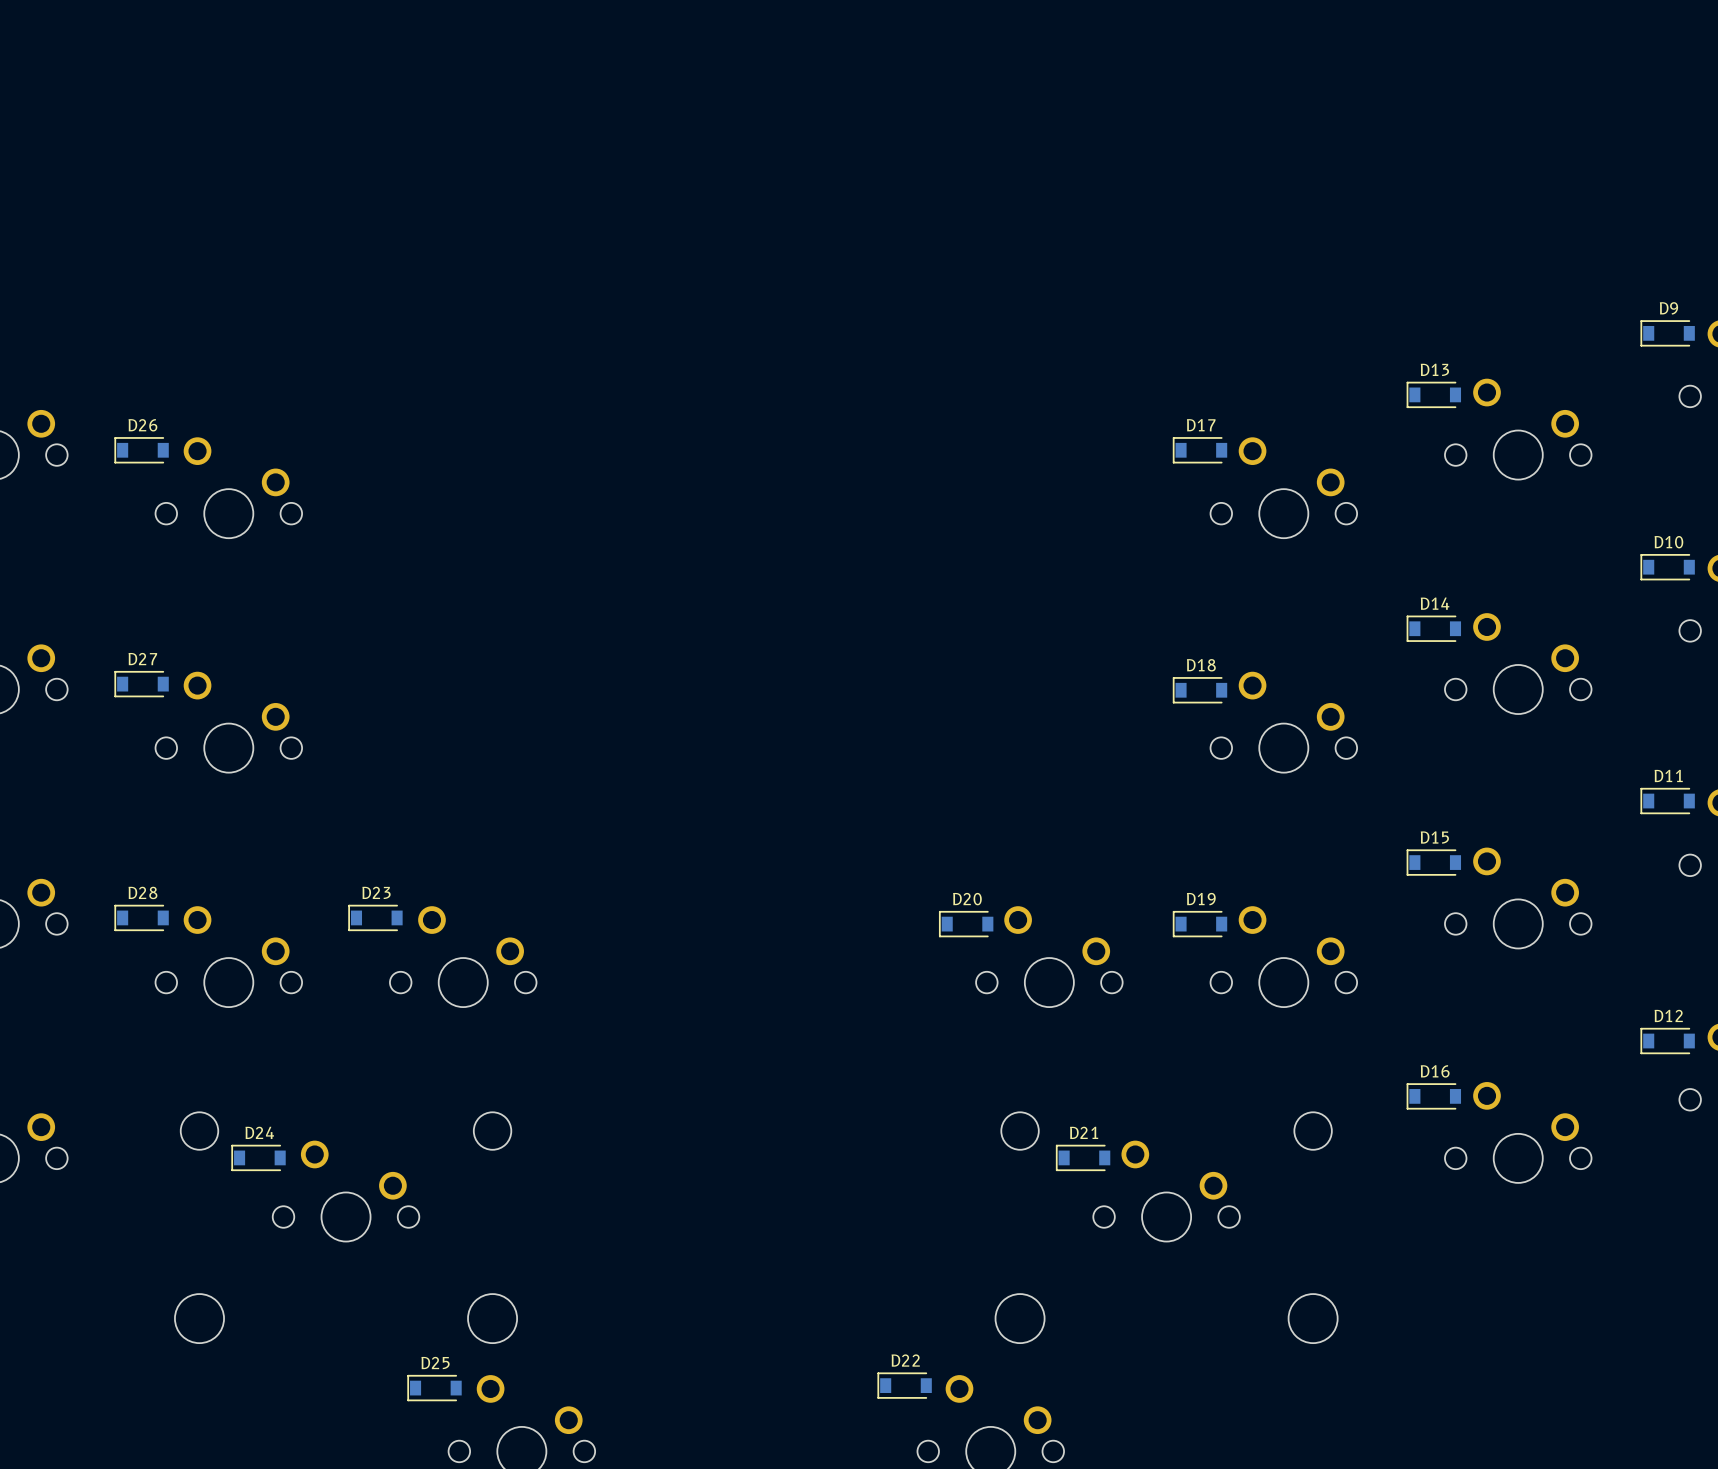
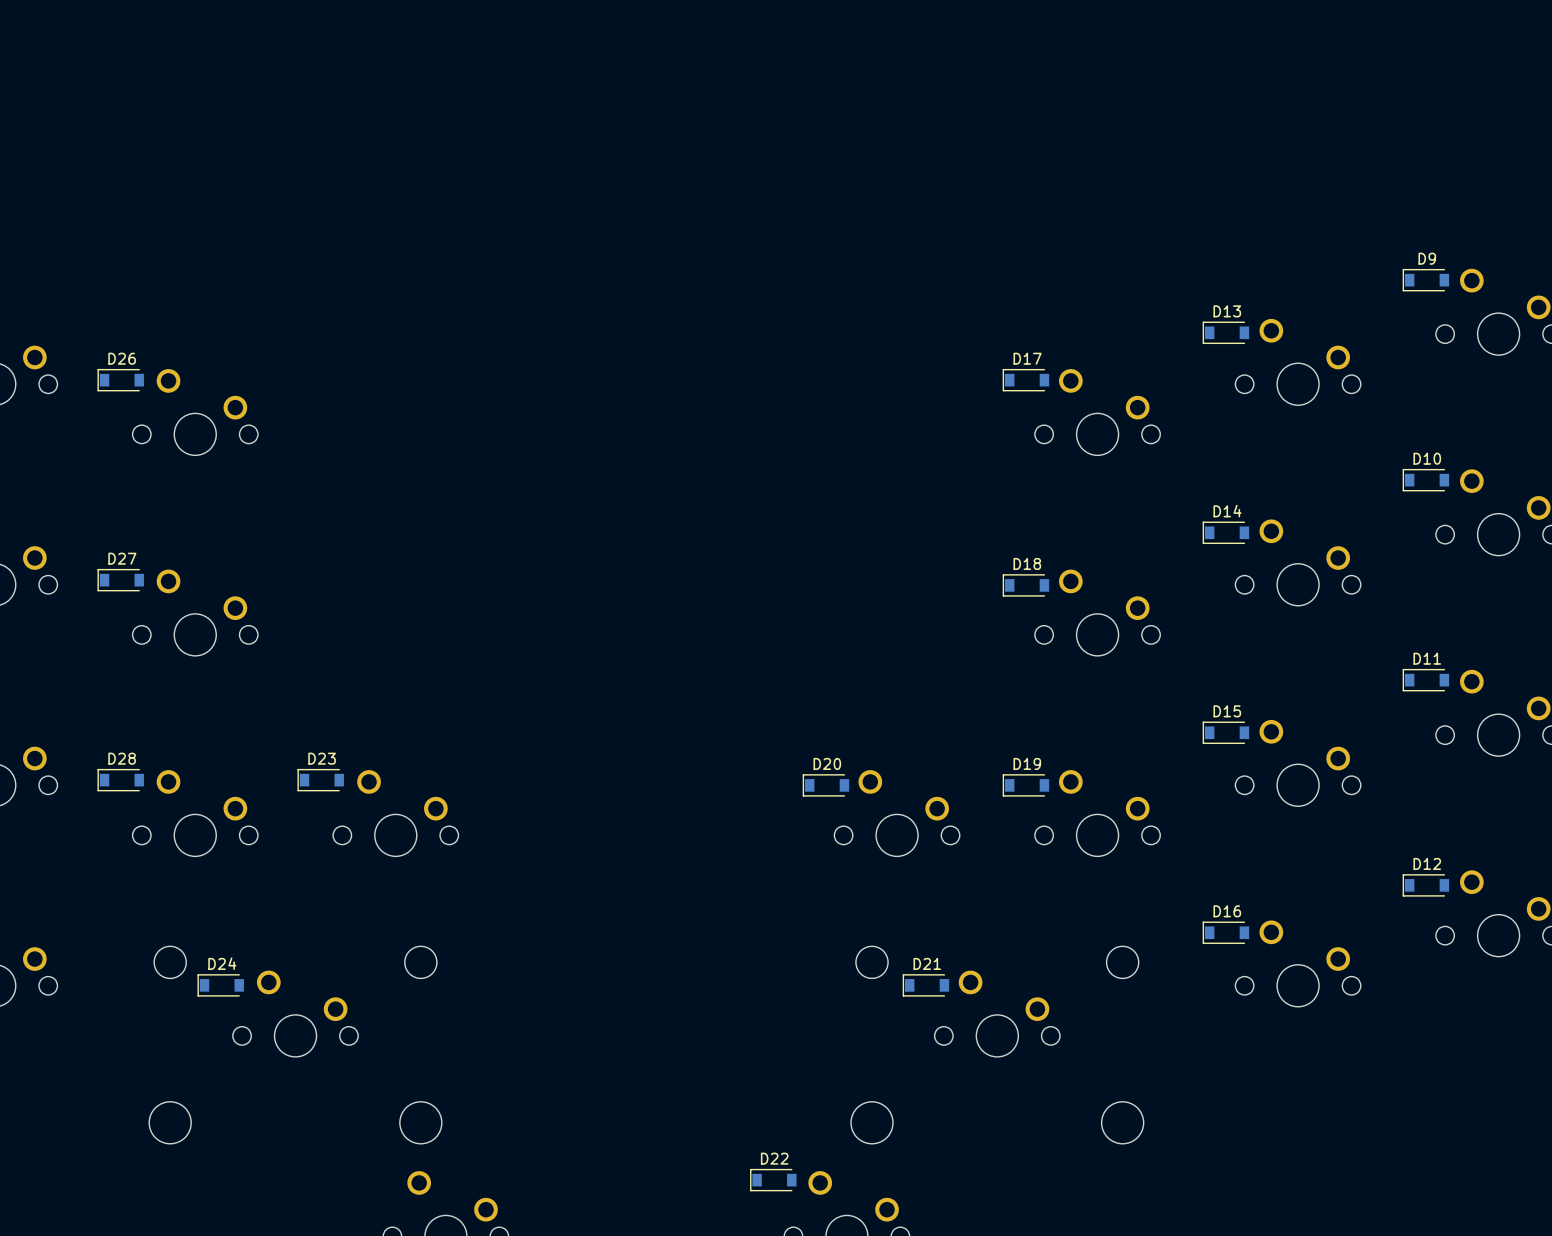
D25: (434, 1388) -> none

